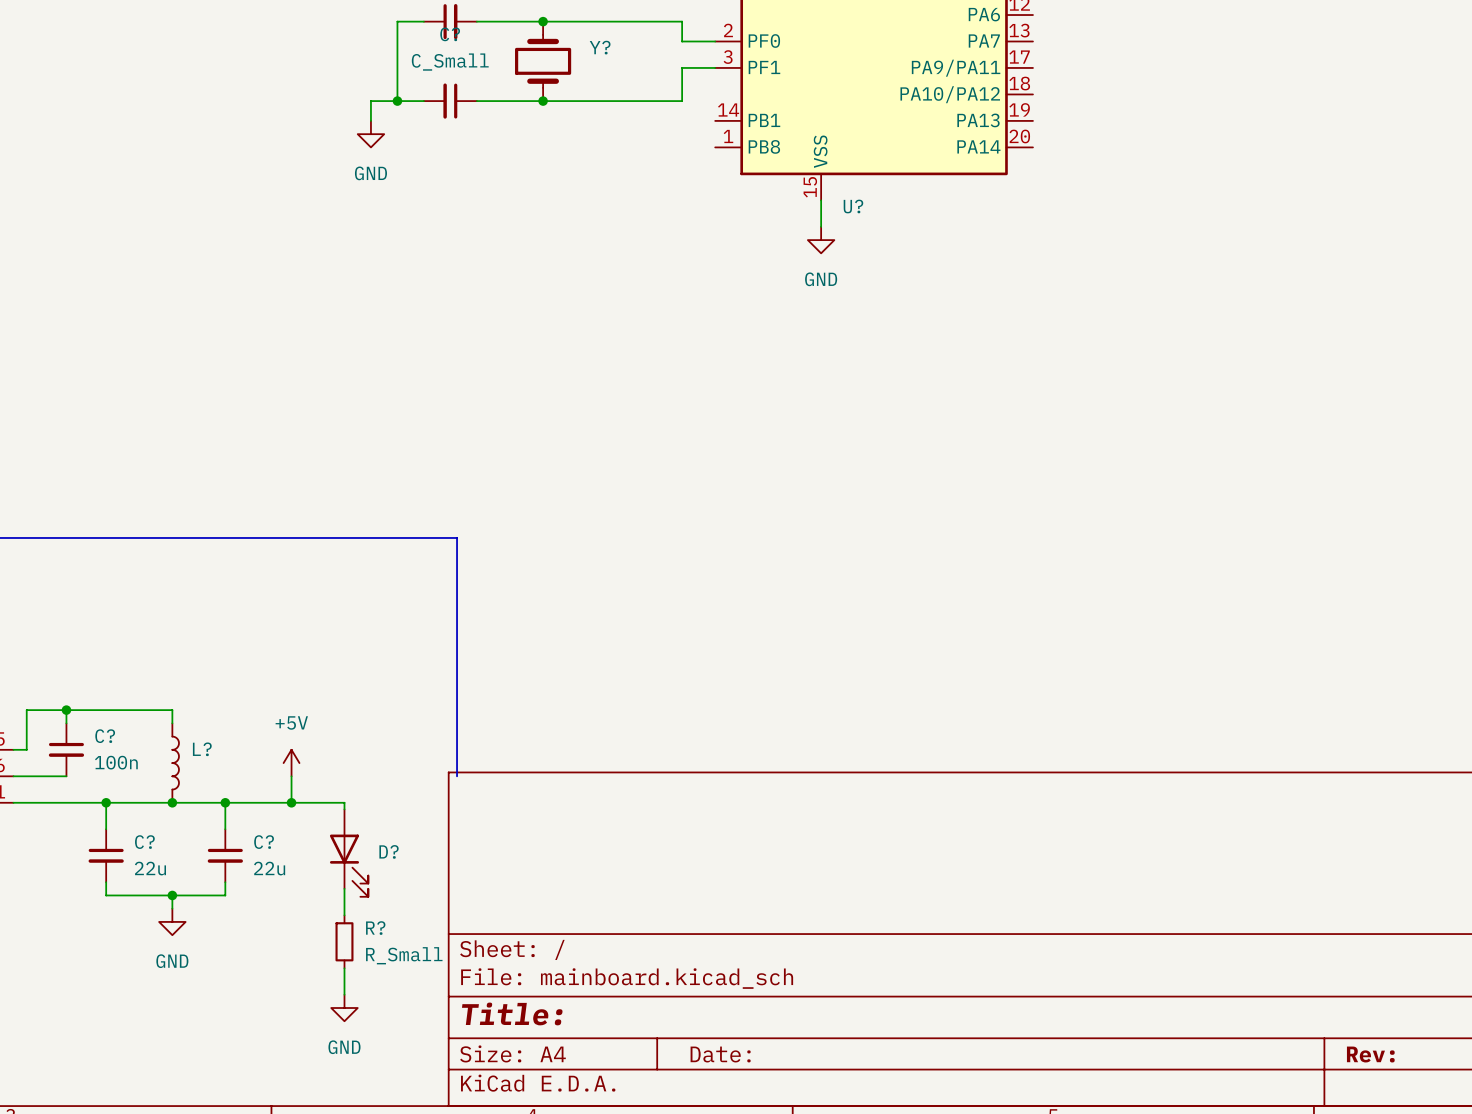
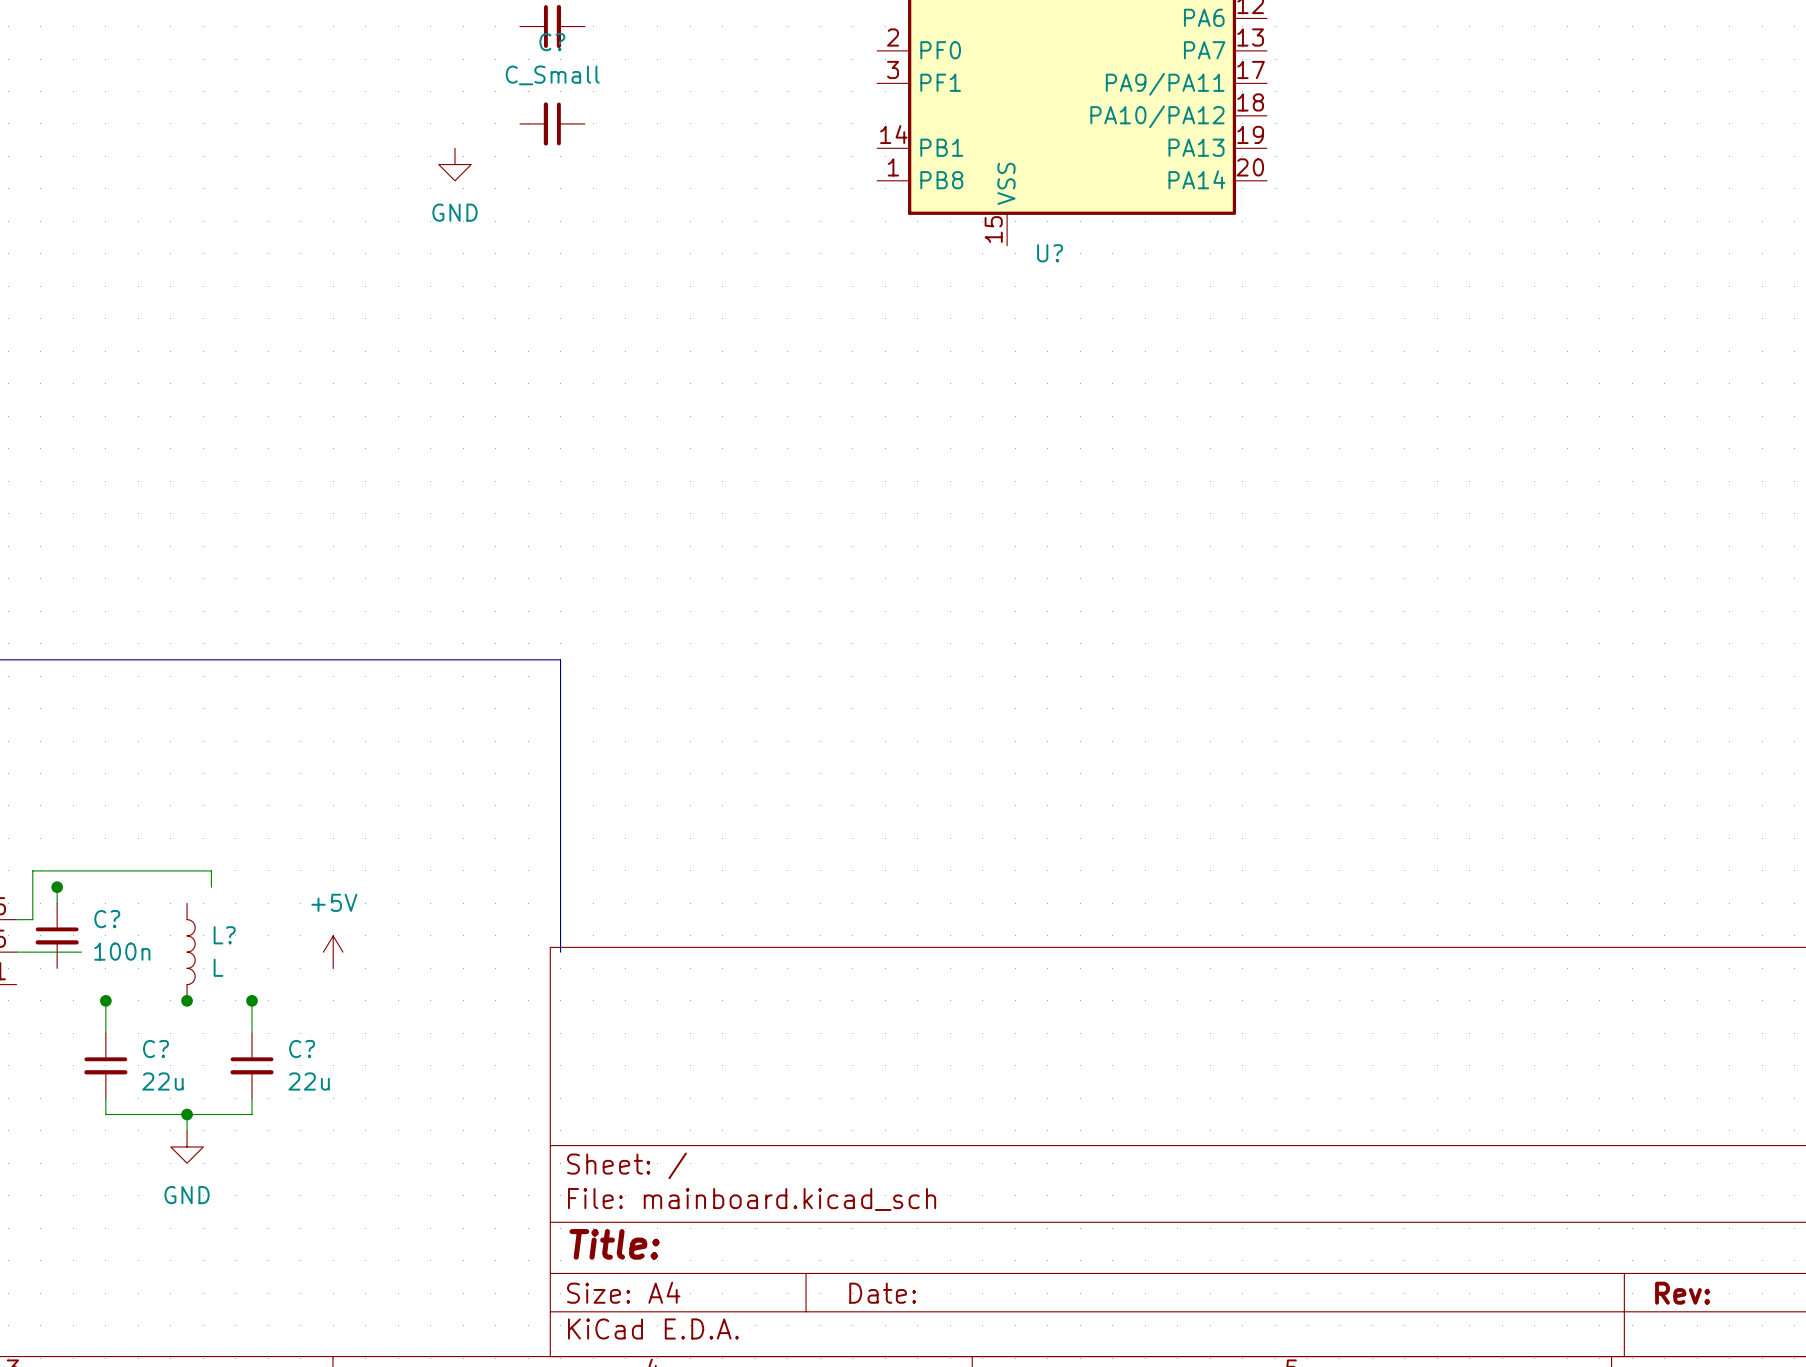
wire: (423, 21) (397, 21) (397, 101) -> none
wire: (476, 21) (682, 21) (682, 41) (715, 41) -> none
junction: (543, 21) -> none
Y?: (543, 61) -> none
wire: (715, 67) (682, 67) (682, 101) (476, 101) -> none
junction: (397, 101) -> none
wire: (423, 101) (370, 101) (370, 120) -> none
junction: (543, 101) -> none
wire: (821, 200) (821, 226) -> none
power symbol: GND (821, 240) -> none
wire: (66, 710) (66, 723) -> (57, 887) (57, 903)
junction position: (66, 710) -> (57, 887)
C? position: (66, 749) -> (57, 935)
L?: (175, 763) -> none
power symbol position: +5V (291, 763) -> +5V (333, 952)
L?: none -> L (191, 952)
wire: (291, 776) (291, 802) -> none
wire: (13, 802) (344, 802) (344, 809) -> none
wire: (106, 802) (106, 829) -> (105, 1000) (105, 1033)
junction position: (106, 802) -> (105, 1000)
junction: (172, 802) -> none
wire: (225, 802) (225, 829) -> (252, 1000) (252, 1033)
junction: (225, 802) -> none
junction: (291, 802) -> none
junction: none -> (187, 1000)
junction: none -> (252, 1000)
D?: (349, 853) -> none
C? position: (106, 855) -> (105, 1065)
C? position: (225, 855) -> (252, 1065)
wire: (106, 882) (106, 895) (225, 895) (225, 882) -> (105, 1098) (105, 1114) (252, 1114) (252, 1098)
wire: (344, 888) (344, 915) -> none
wire: (172, 895) (172, 908) -> (187, 1114) (187, 1130)
junction position: (172, 895) -> (187, 1114)
power symbol position: GND (172, 921) -> GND (187, 1146)
R?: R_Small (344, 941) -> none
wire: (344, 968) (344, 994) -> none
power symbol: GND (344, 1008) -> none

